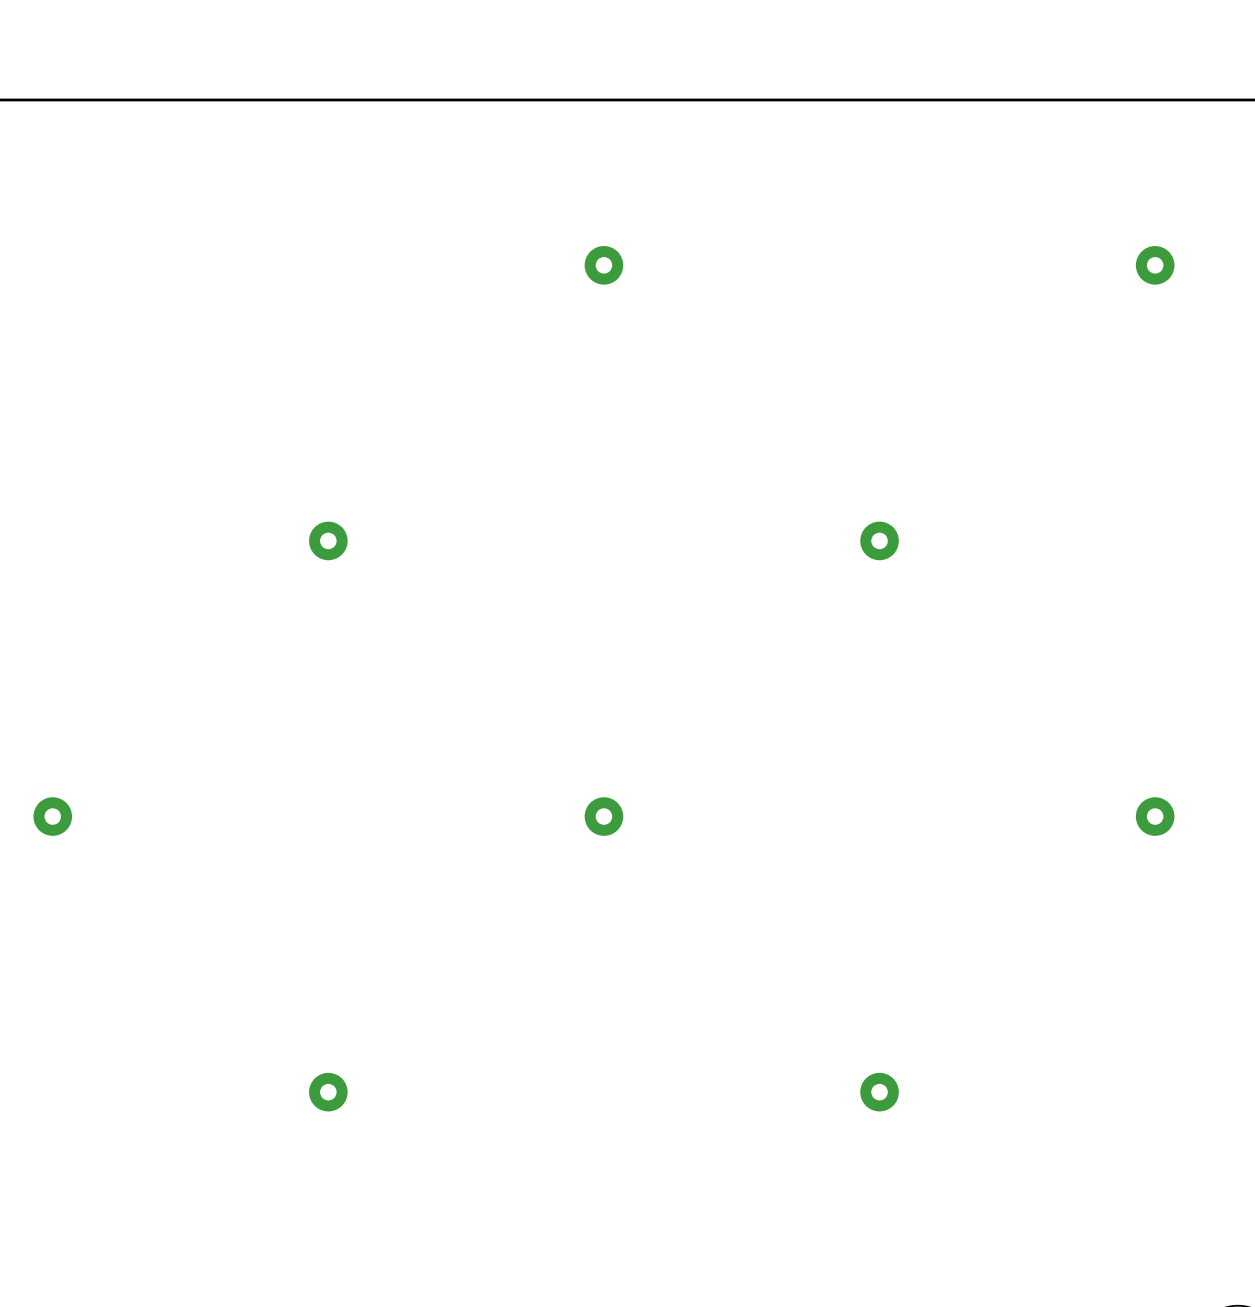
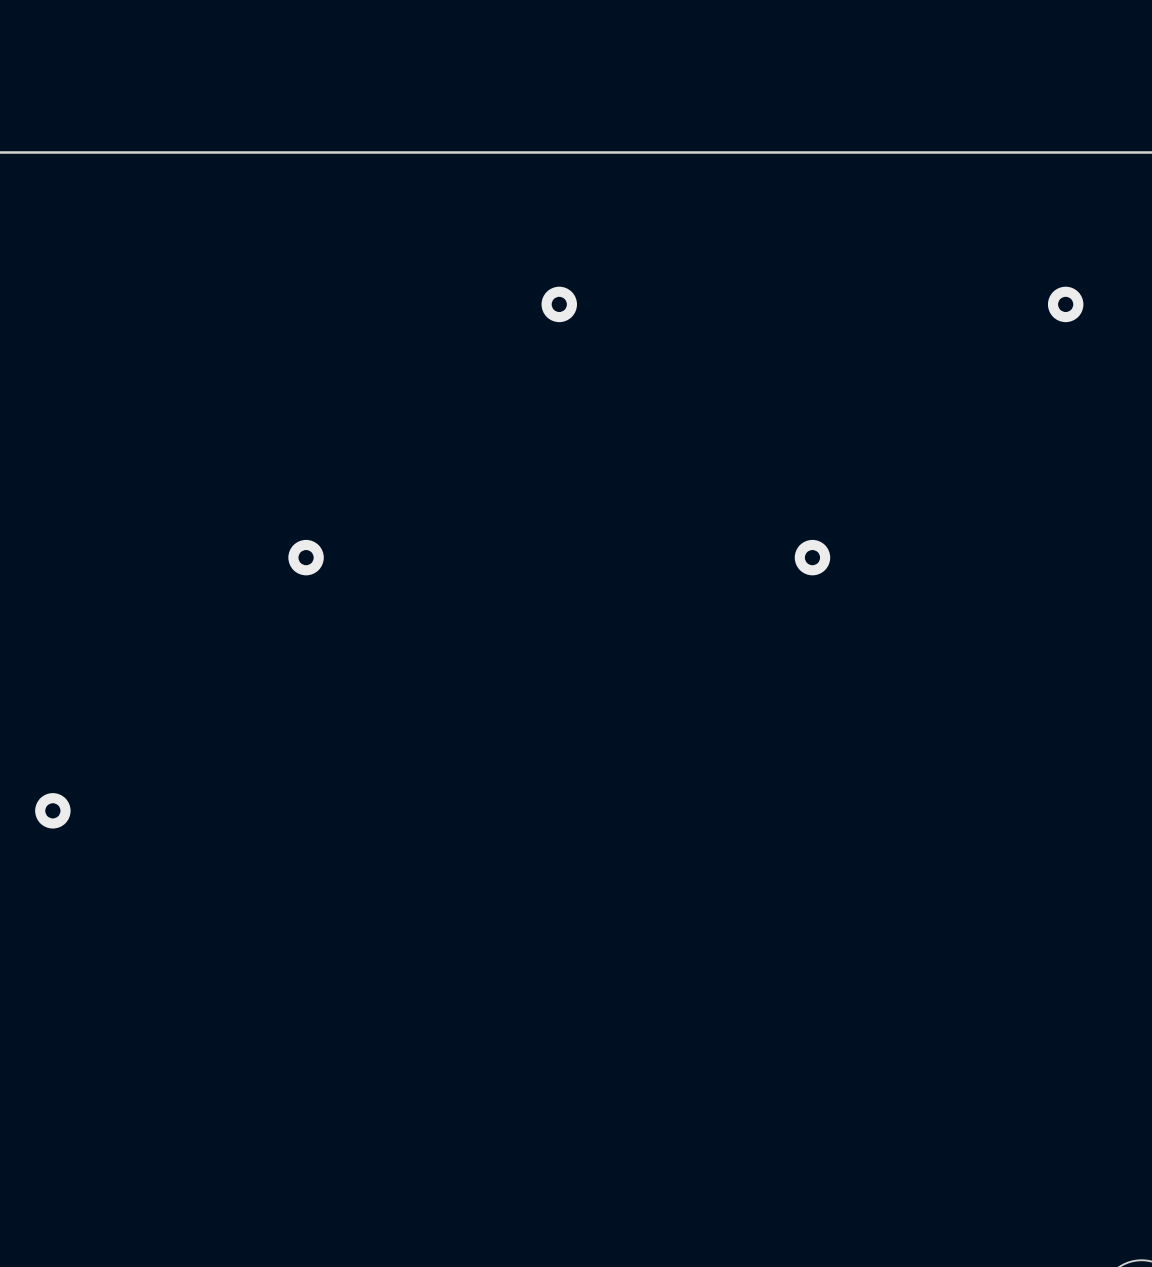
via: (603, 816) -> none
via: (1155, 816) -> none
via: (328, 1092) -> none
via: (879, 1092) -> none

